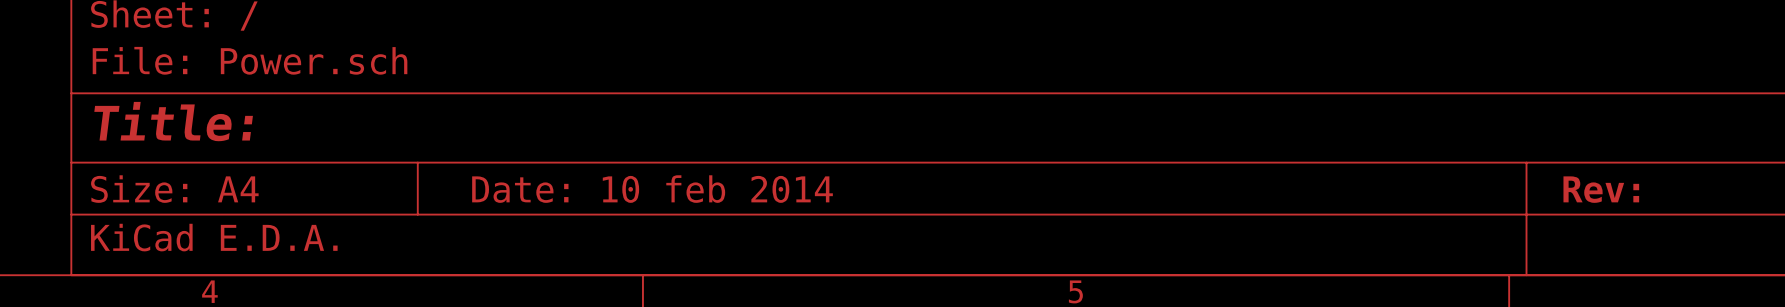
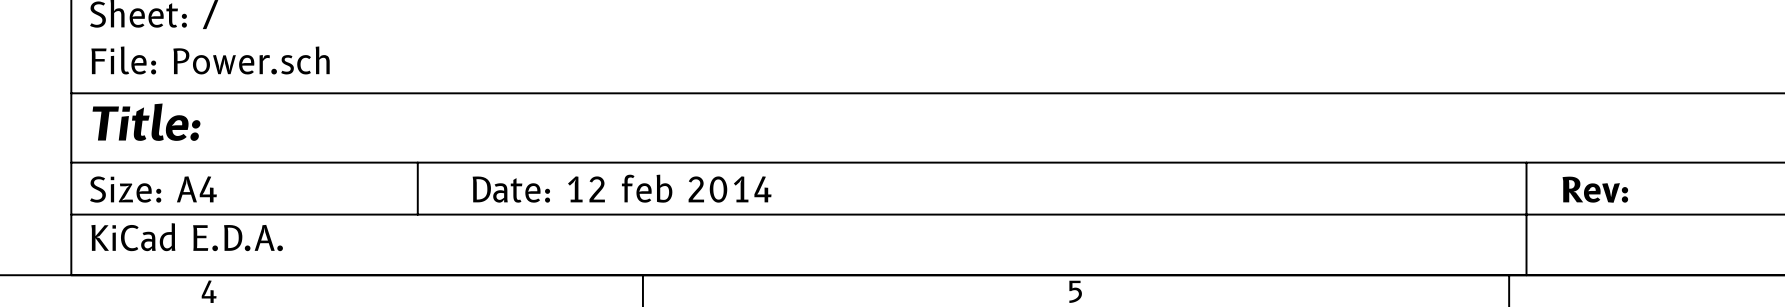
title block: Date: 10 feb 2014 (652, 189) -> Date: 12 feb 2014 (622, 188)

